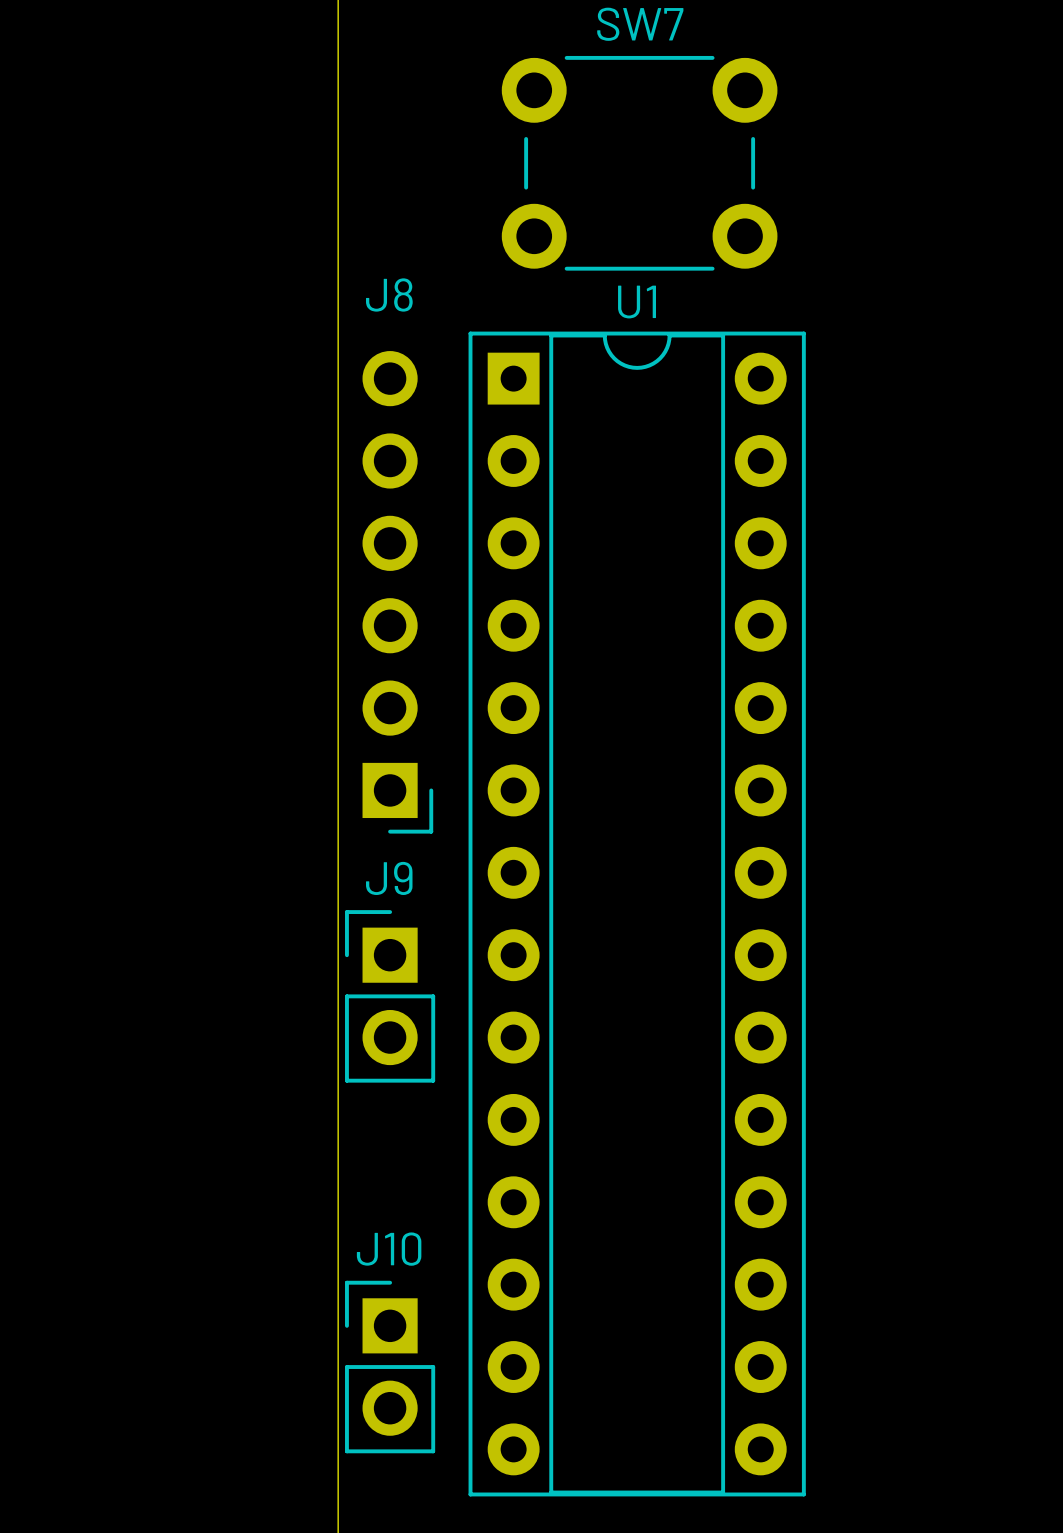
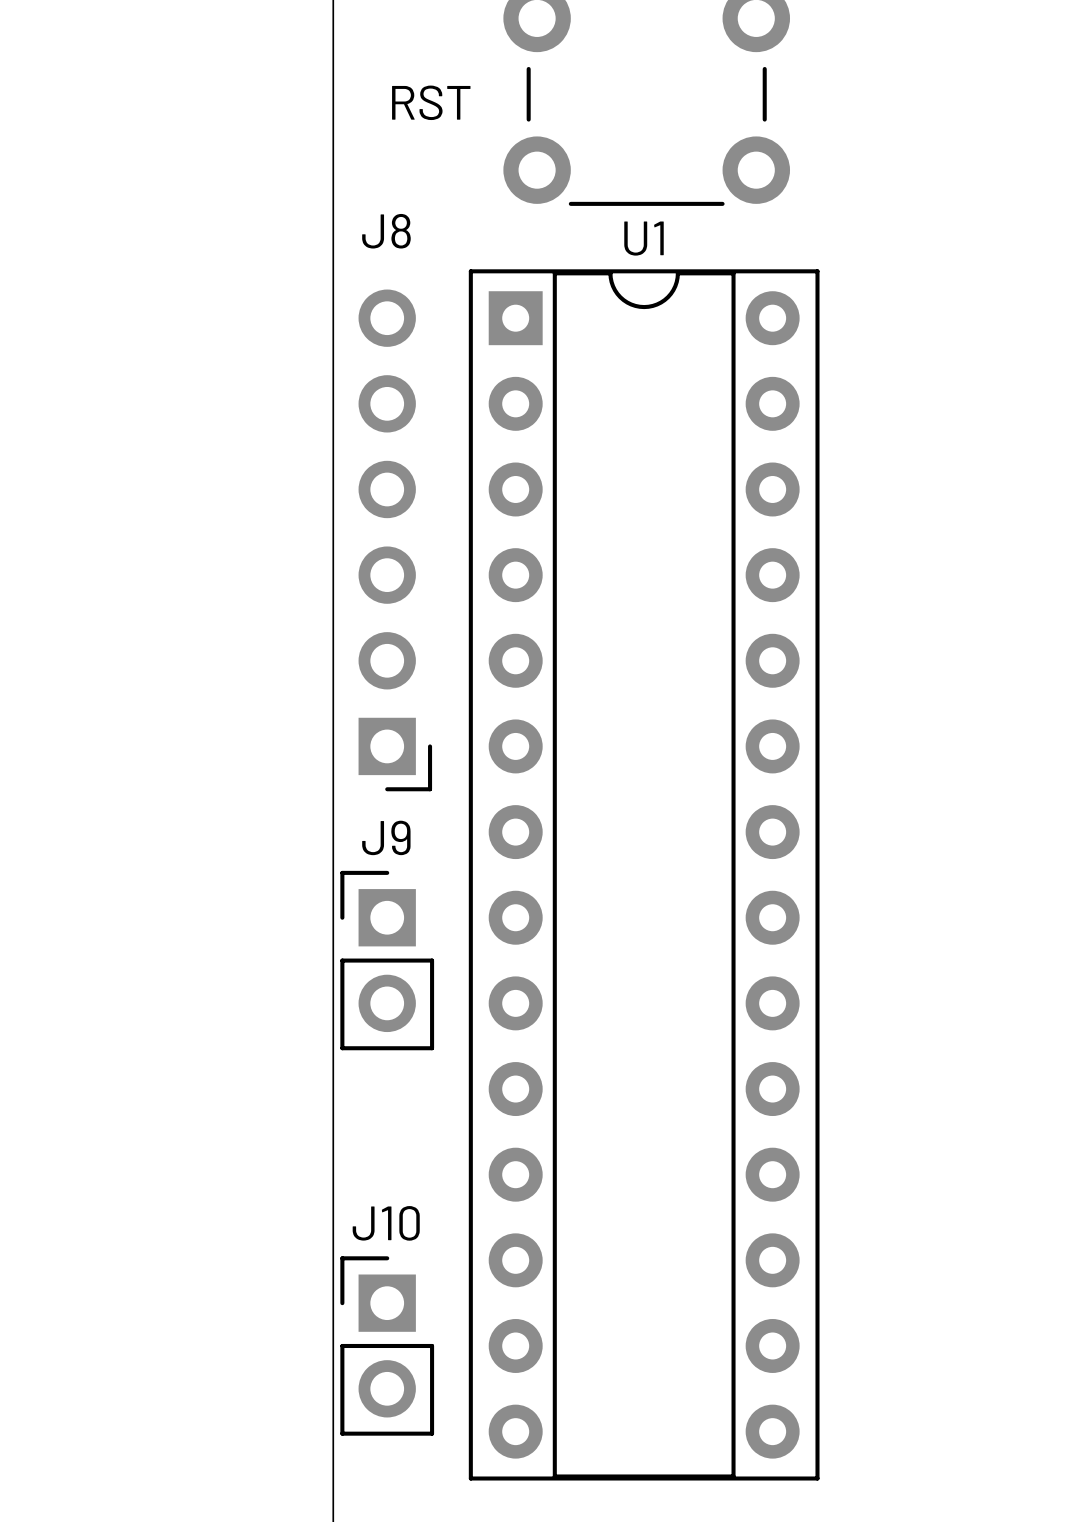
text: none -> RST (431, 102)

